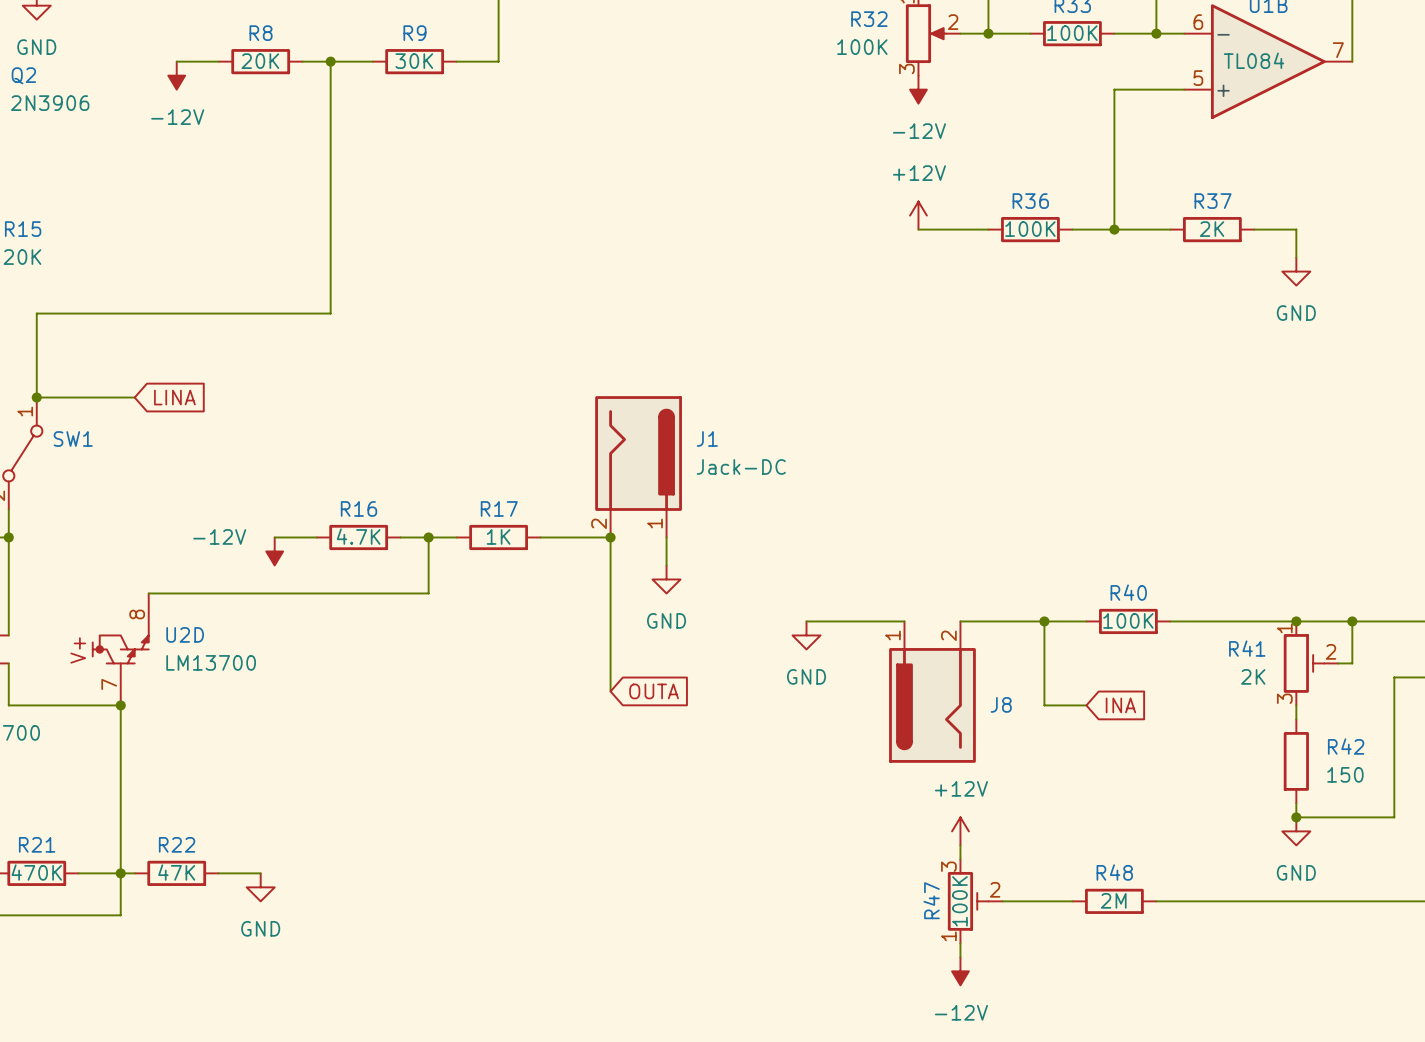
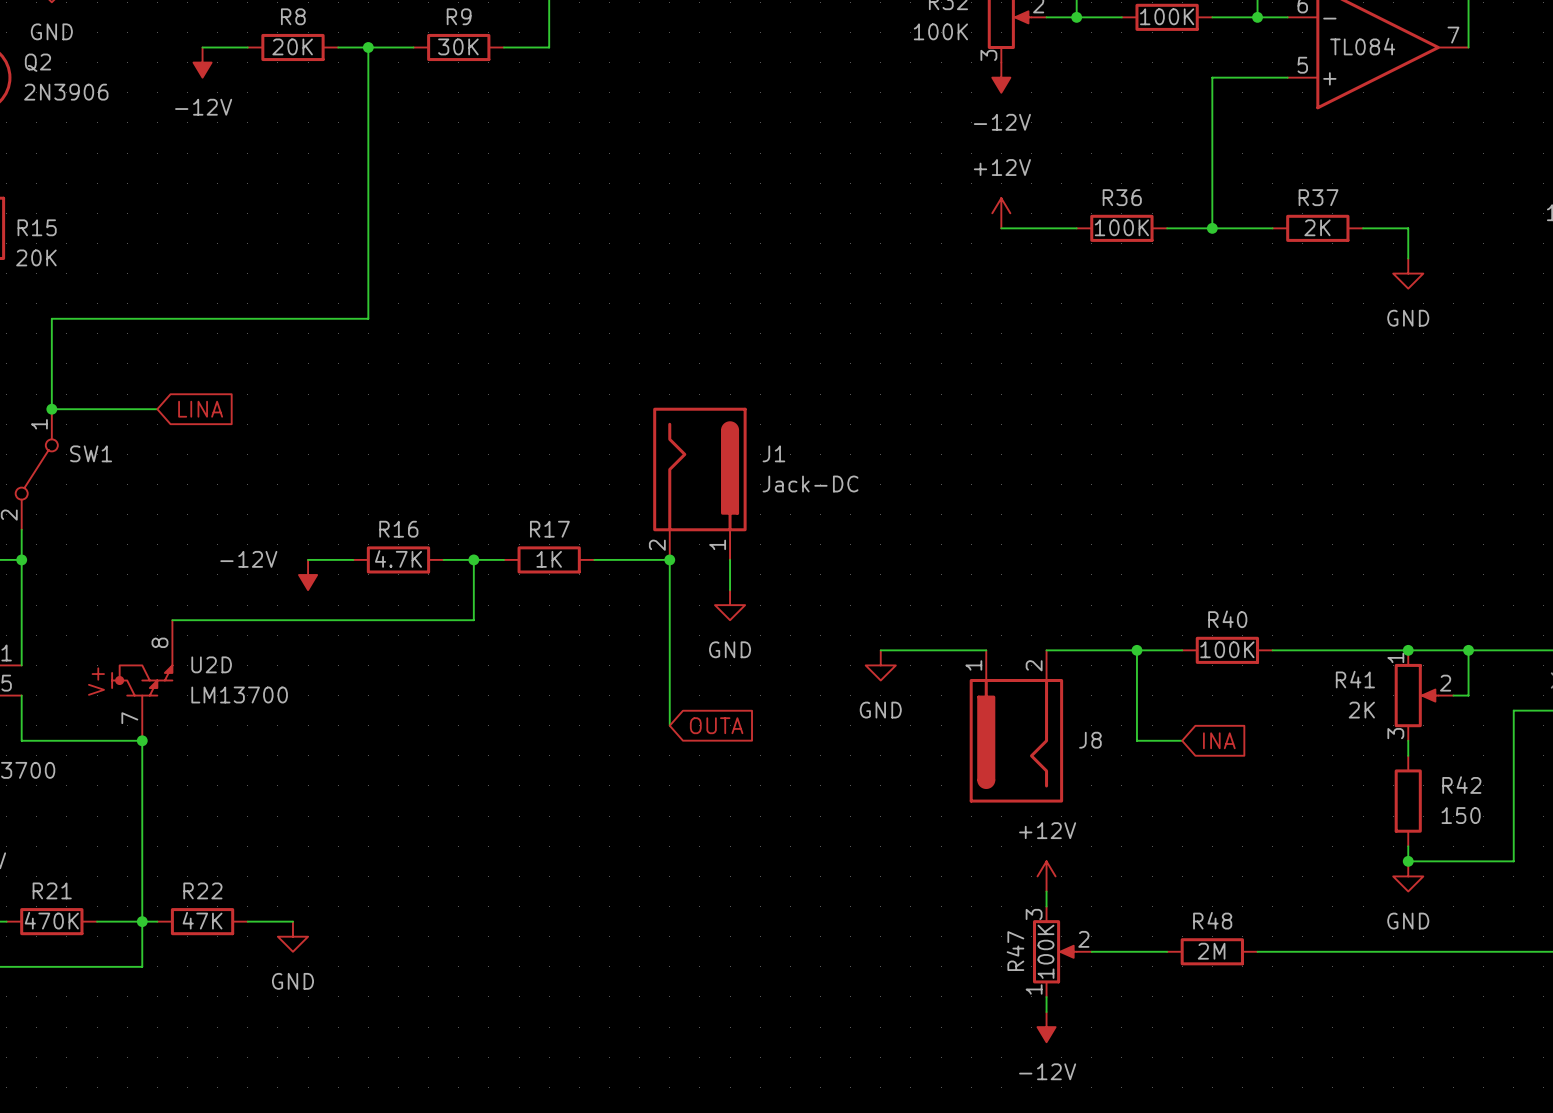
R41 symbol: [1283, 621, 1339, 706] -> [1394, 650, 1454, 741]
R47 symbol: [947, 859, 1003, 944] -> [1032, 906, 1092, 997]

